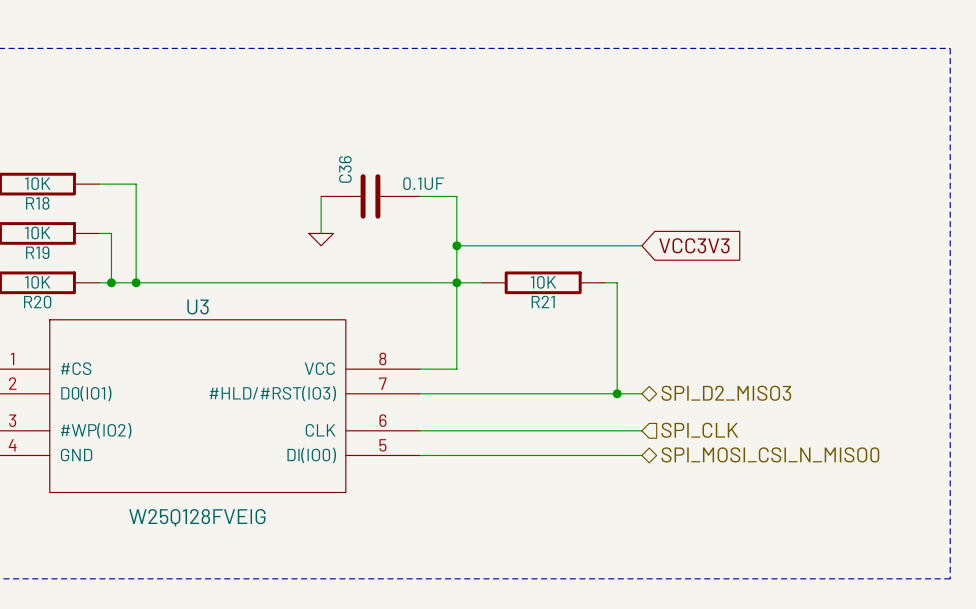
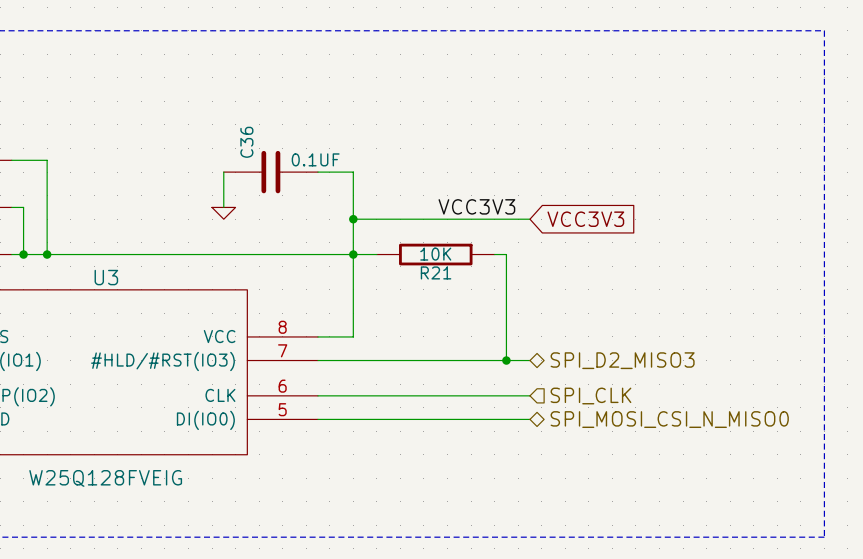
label: none -> VCC3V3 (476, 206)

